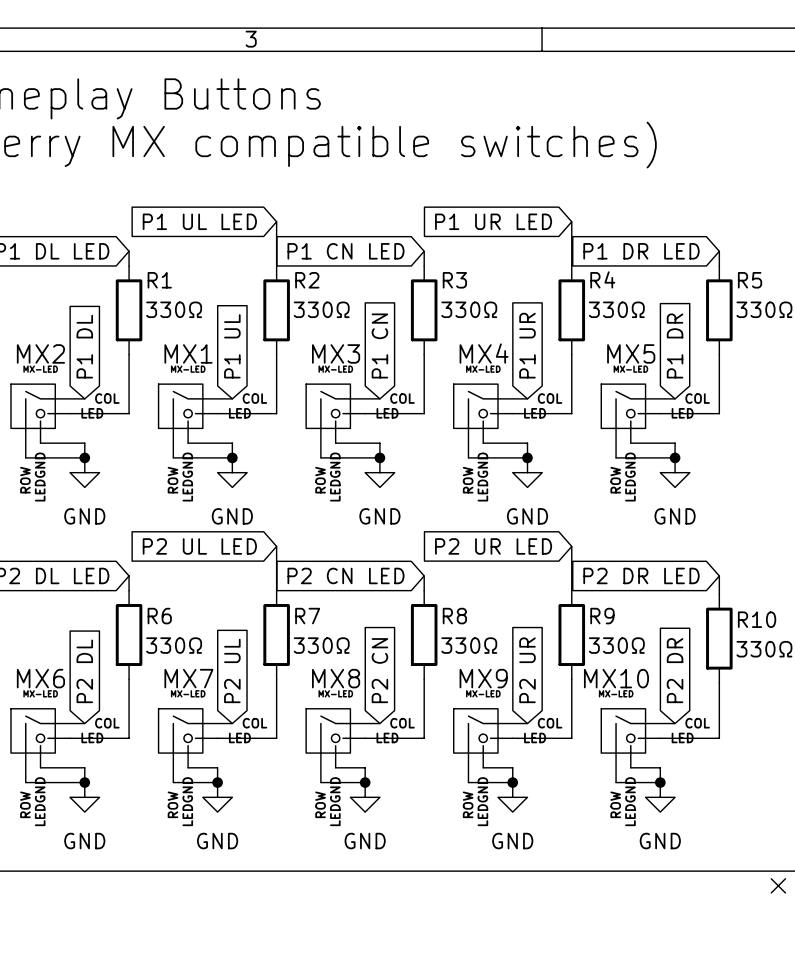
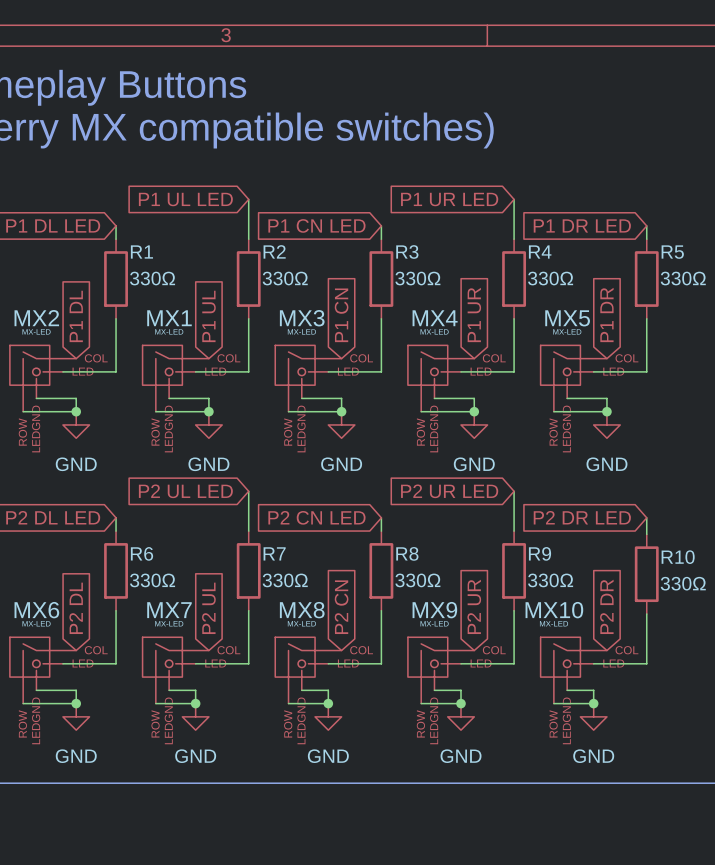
no-connect mark: (778, 885) -> none

